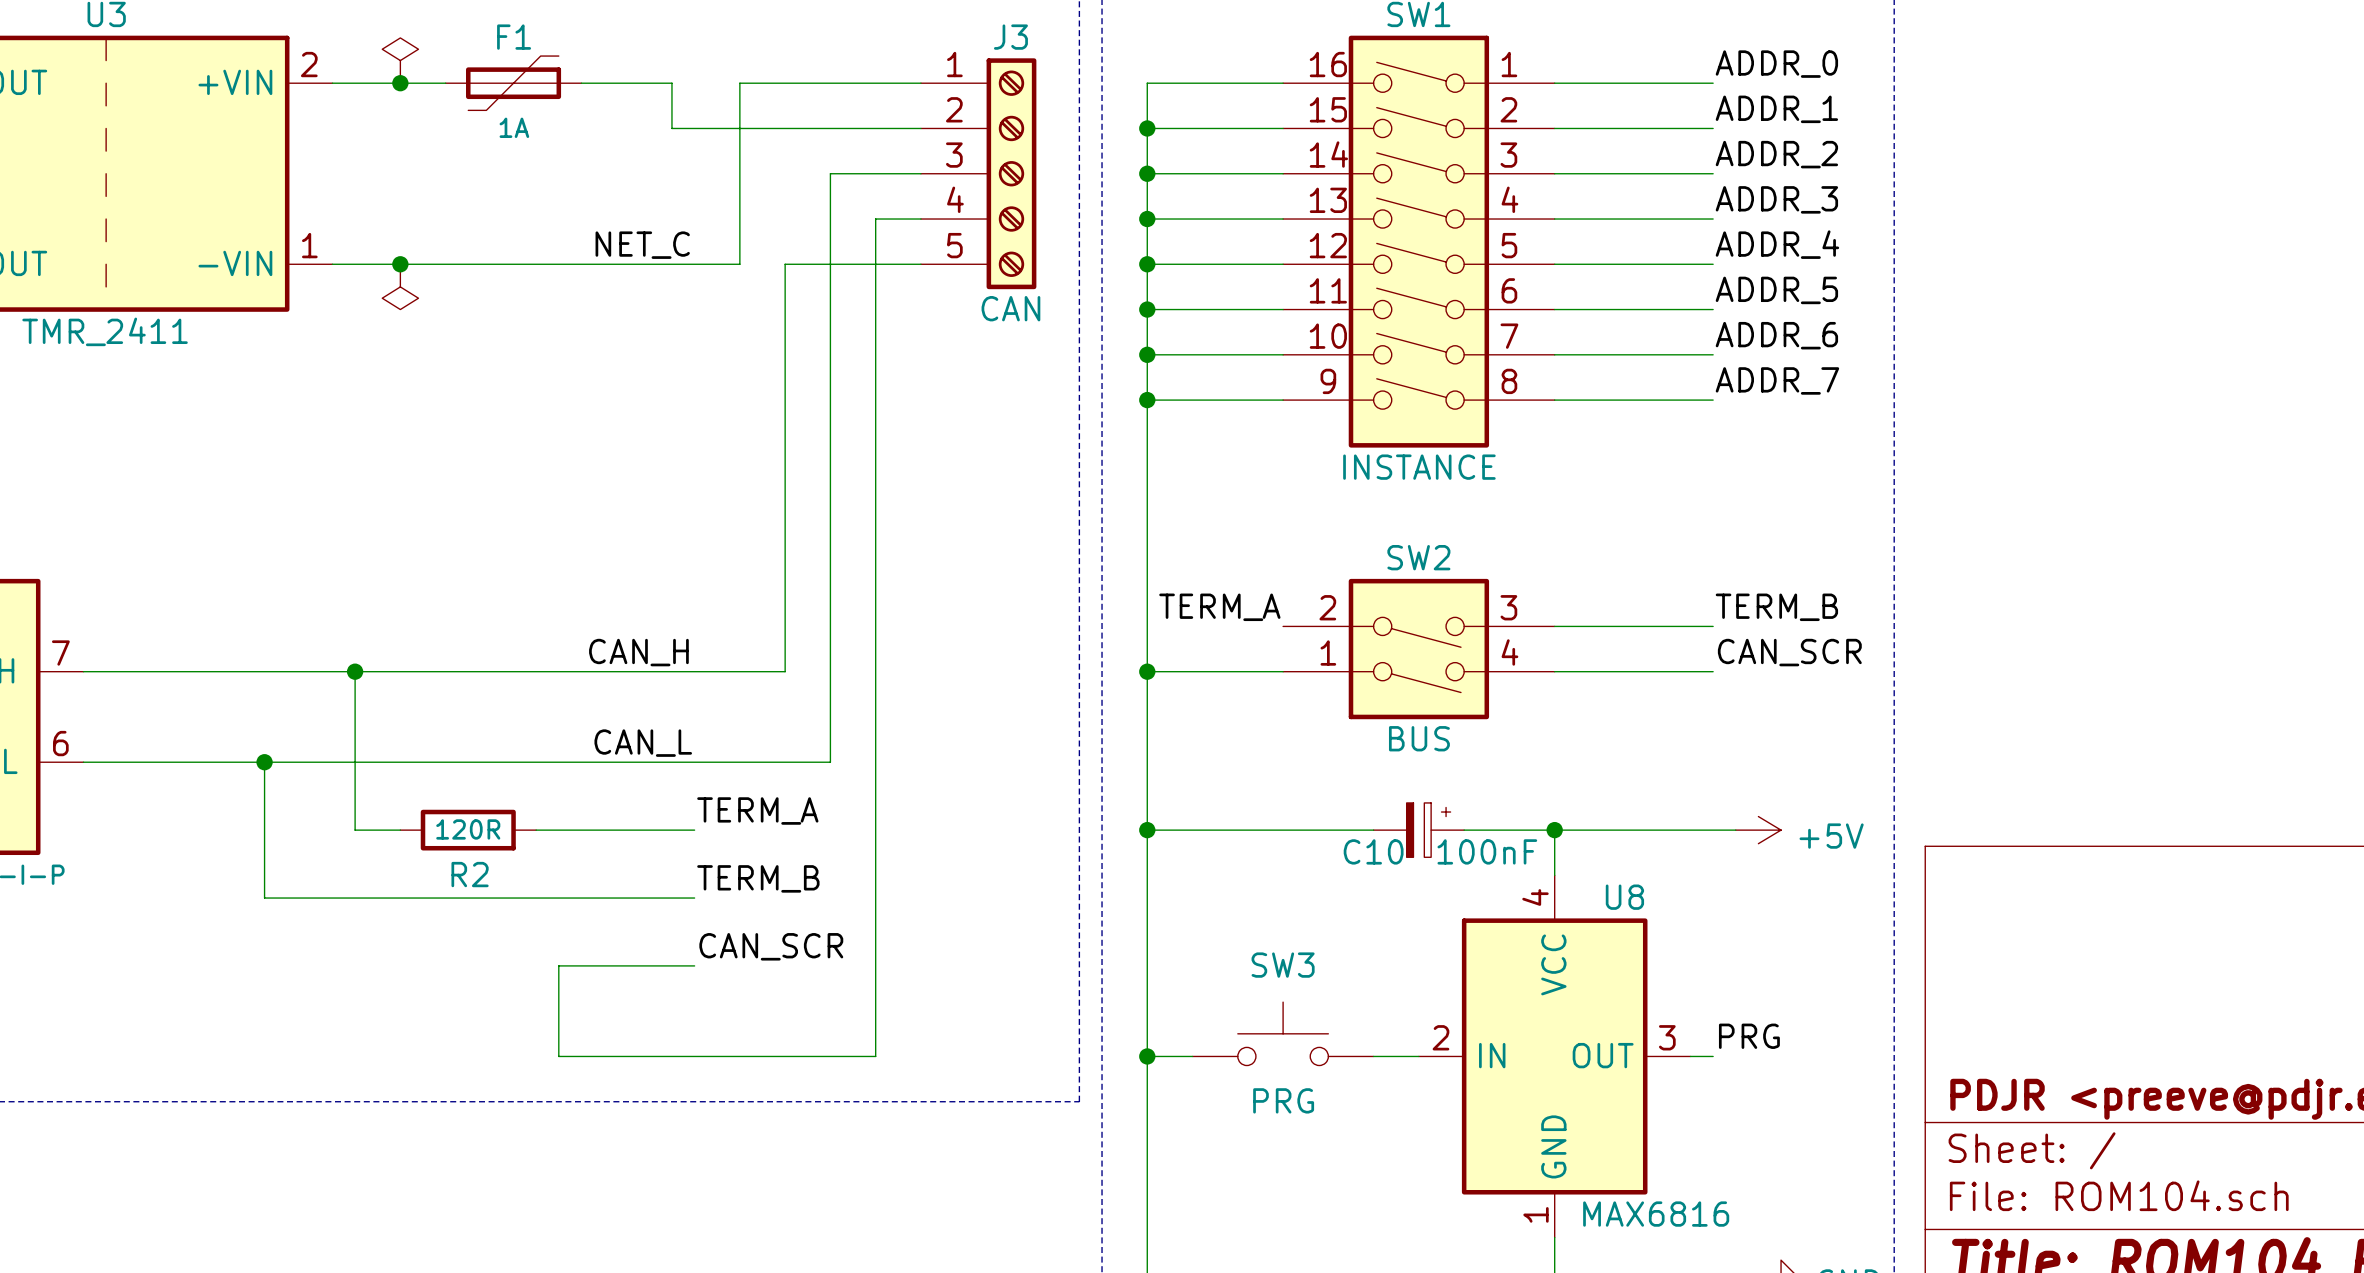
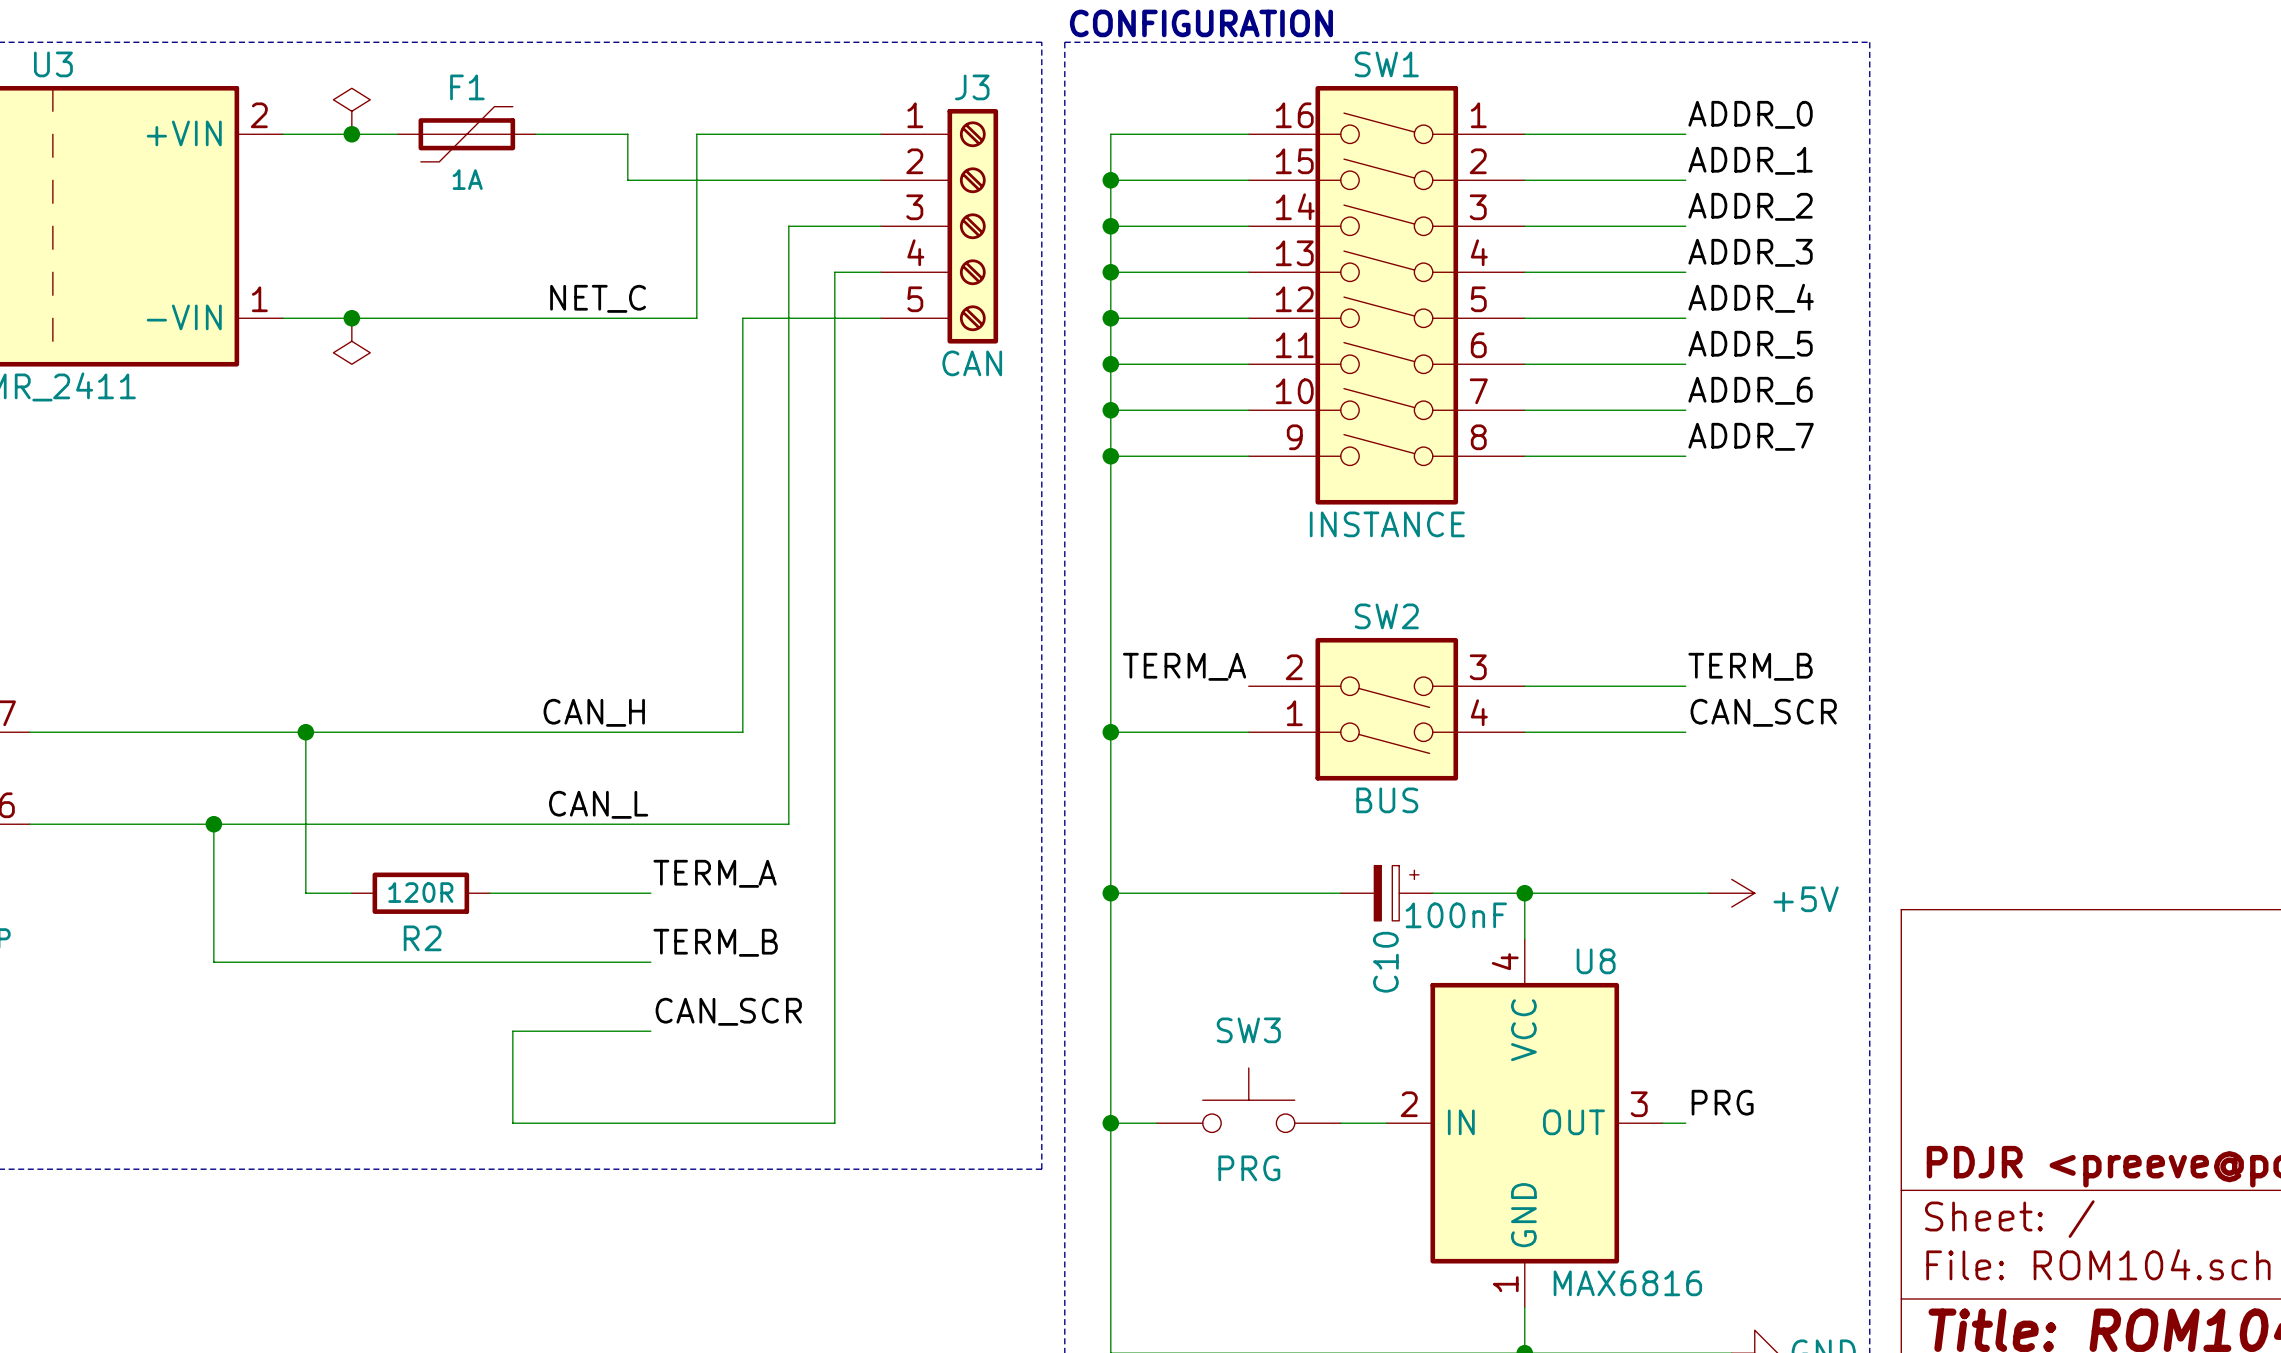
C10 name rotation: 0° (1373, 851) -> 90° counterclockwise (1385, 962)

